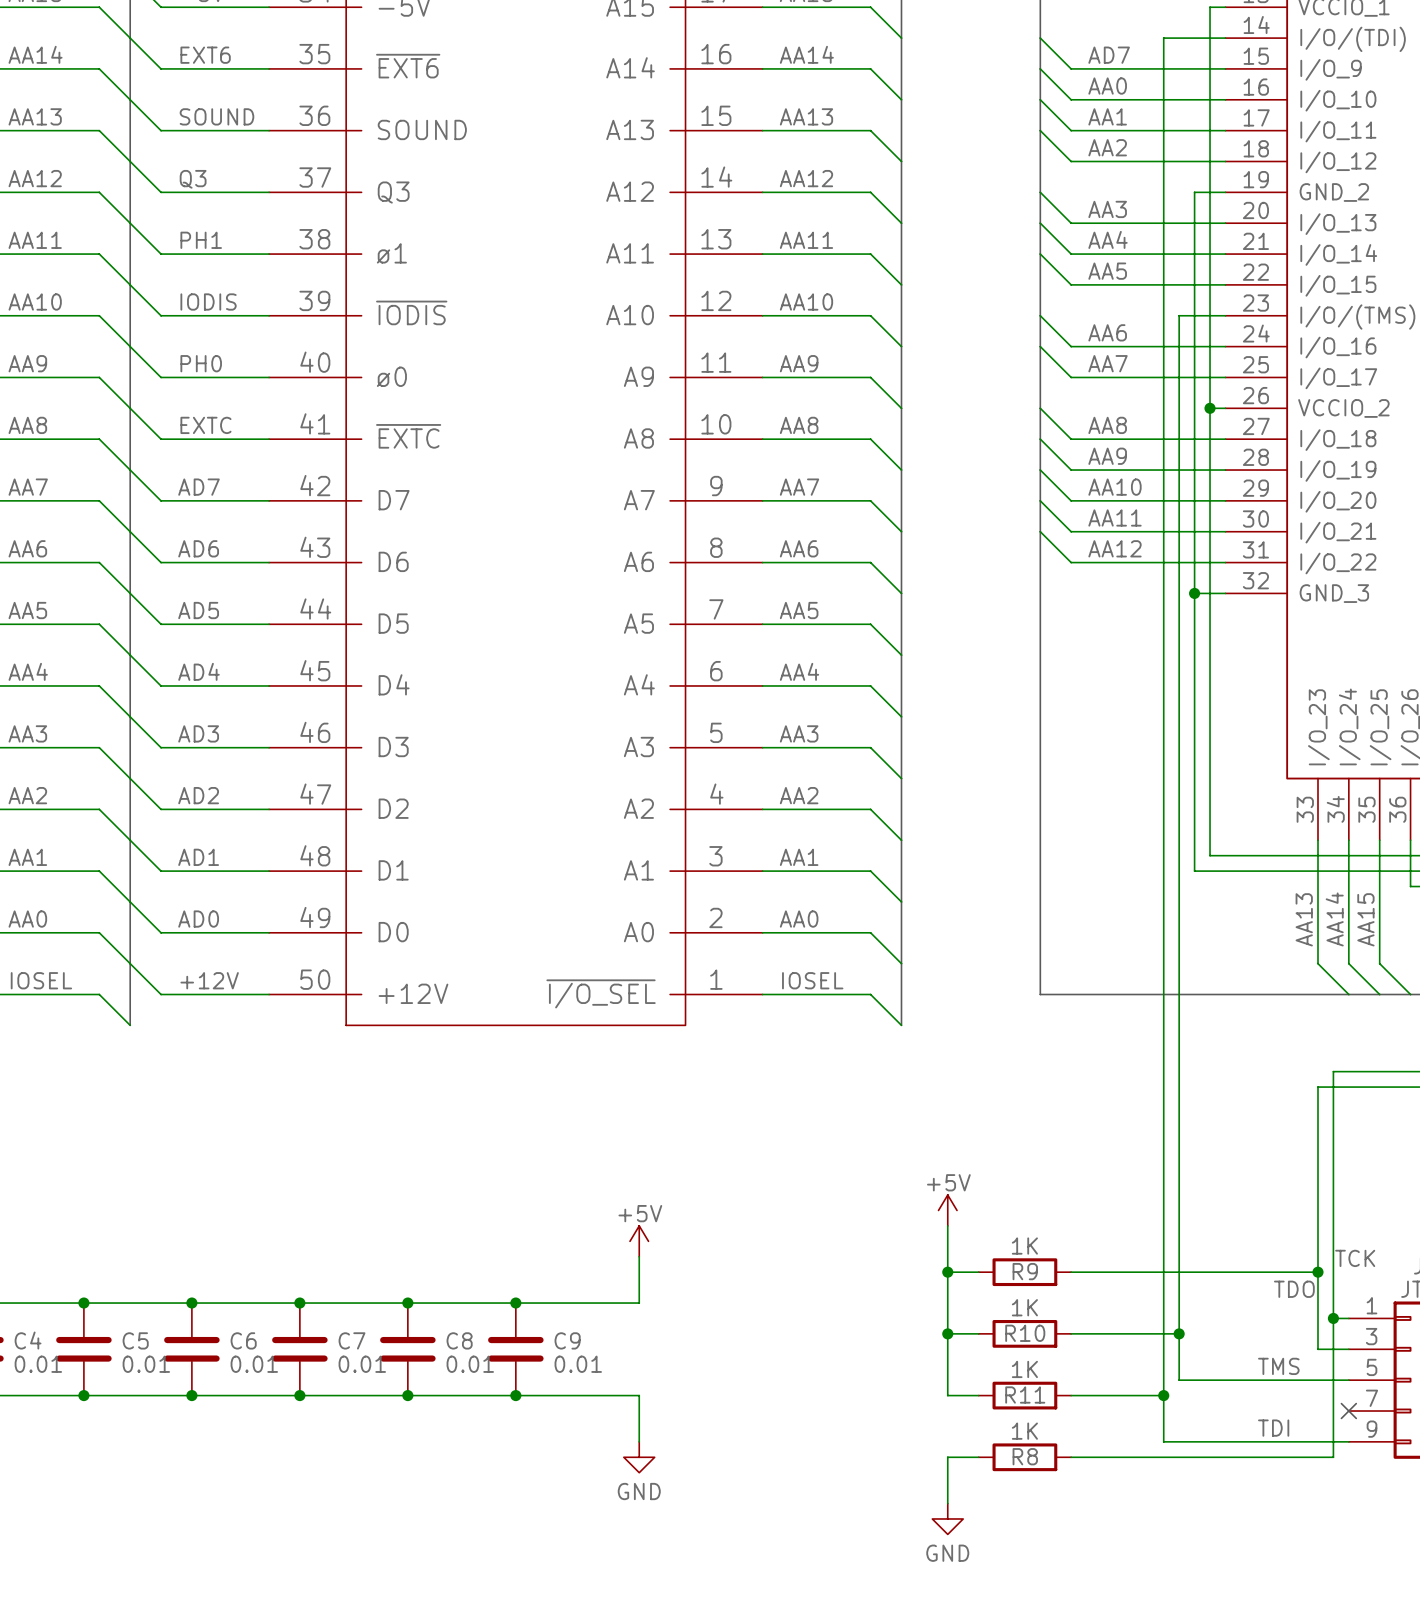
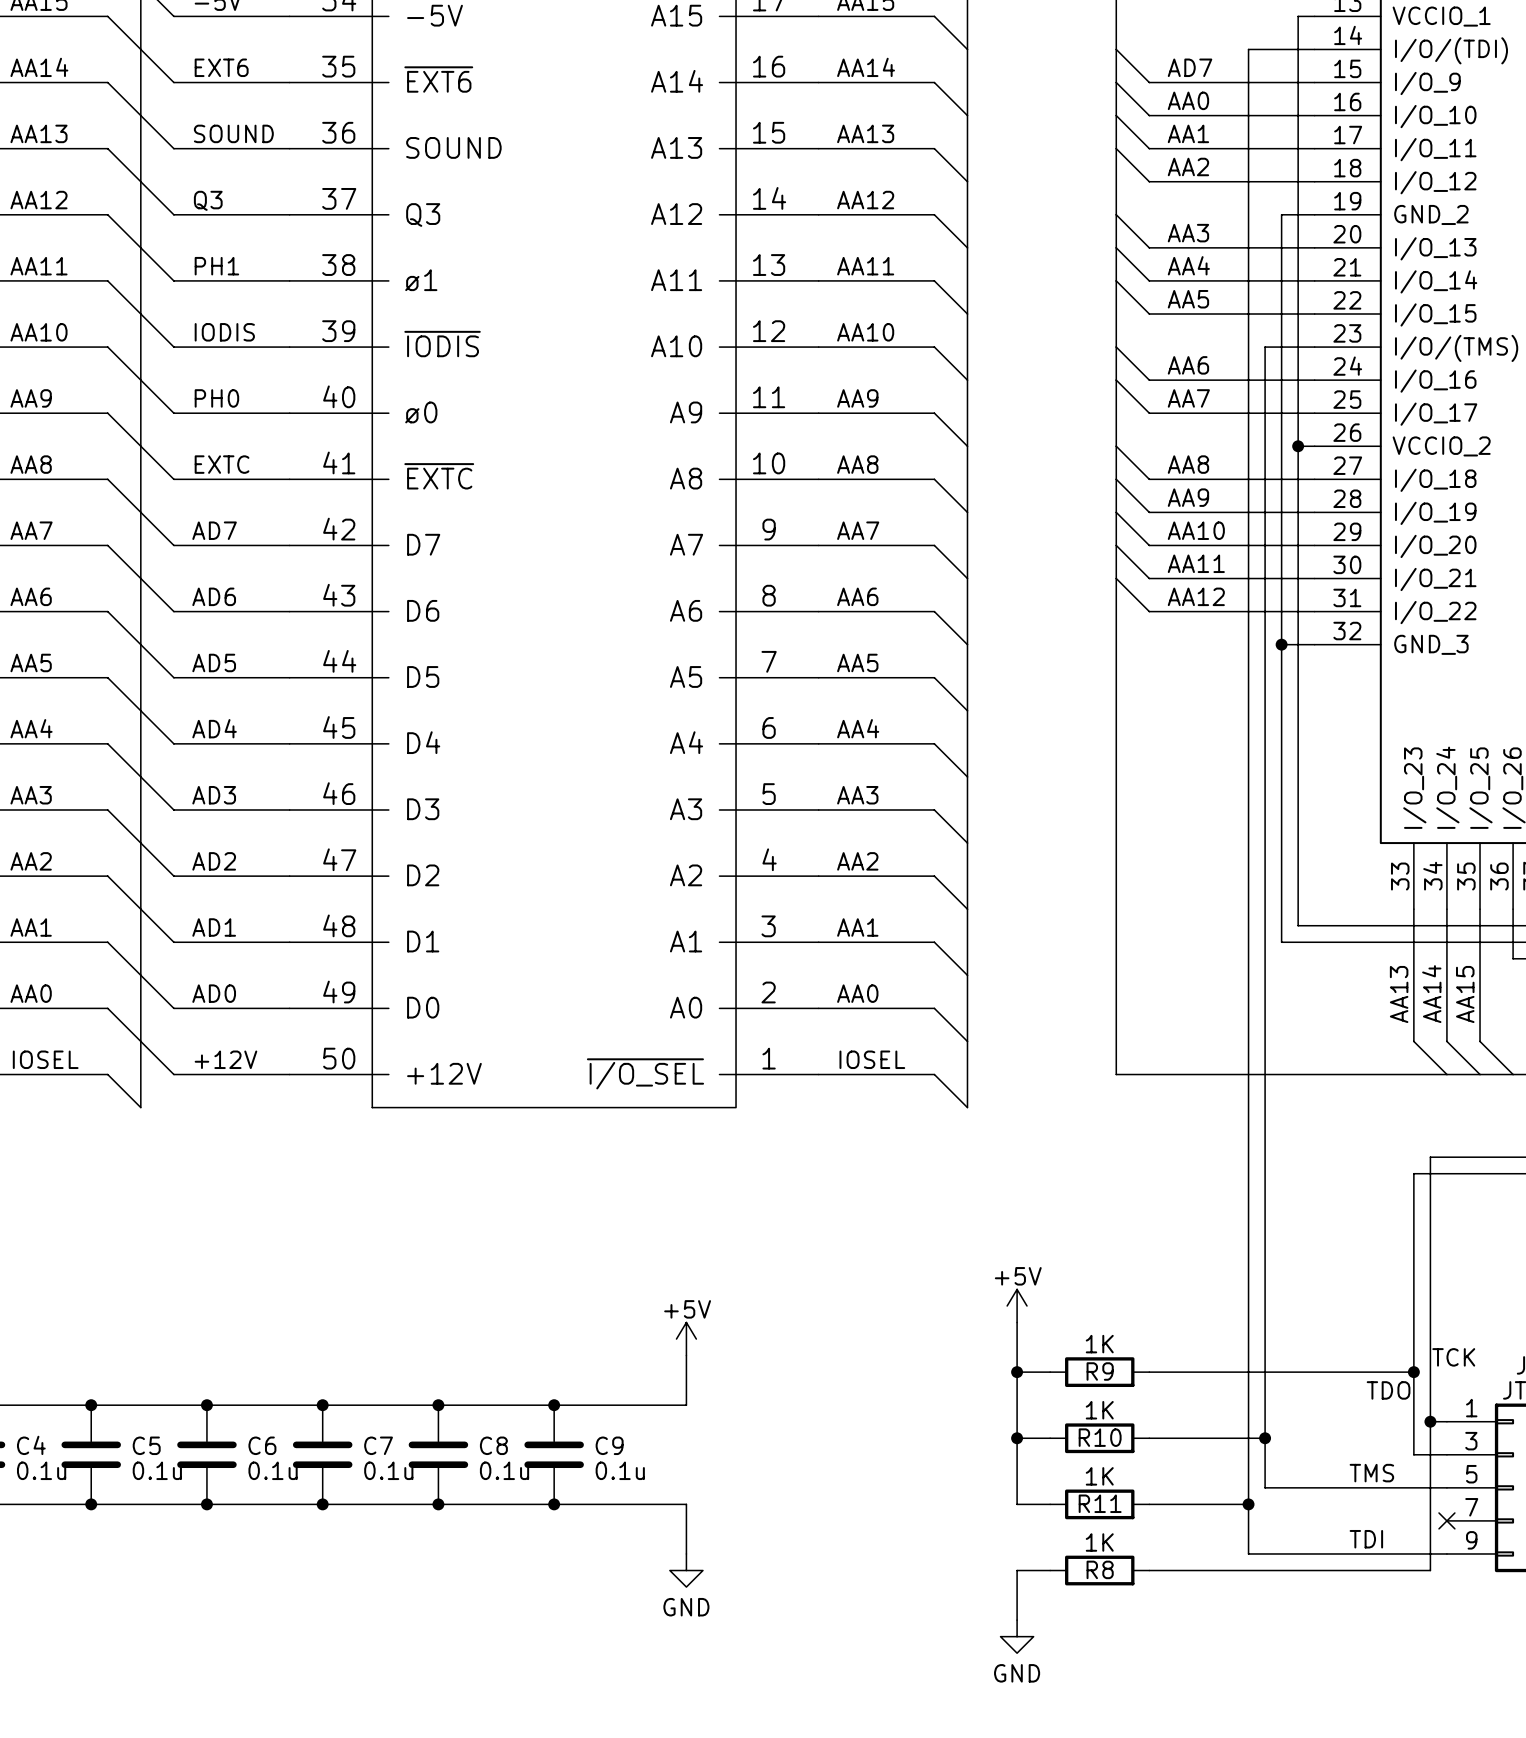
C4 value: 0.01 (38, 1364) -> 0.1u (41, 1470)
C5 value: 0.01 (146, 1364) -> 0.1u (157, 1470)
C6 value: 0.01 (254, 1364) -> 0.1u (273, 1470)
C7 value: 0.01 (362, 1364) -> 0.1u (388, 1470)
C8 value: 0.01 (470, 1364) -> 0.1u (504, 1470)
C9 value: 0.01 (578, 1364) -> 0.1u (620, 1470)

